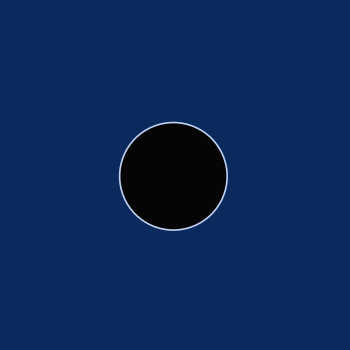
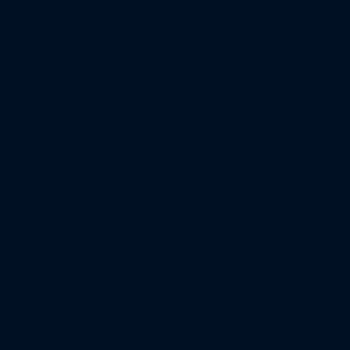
part: (173, 176) -> none

